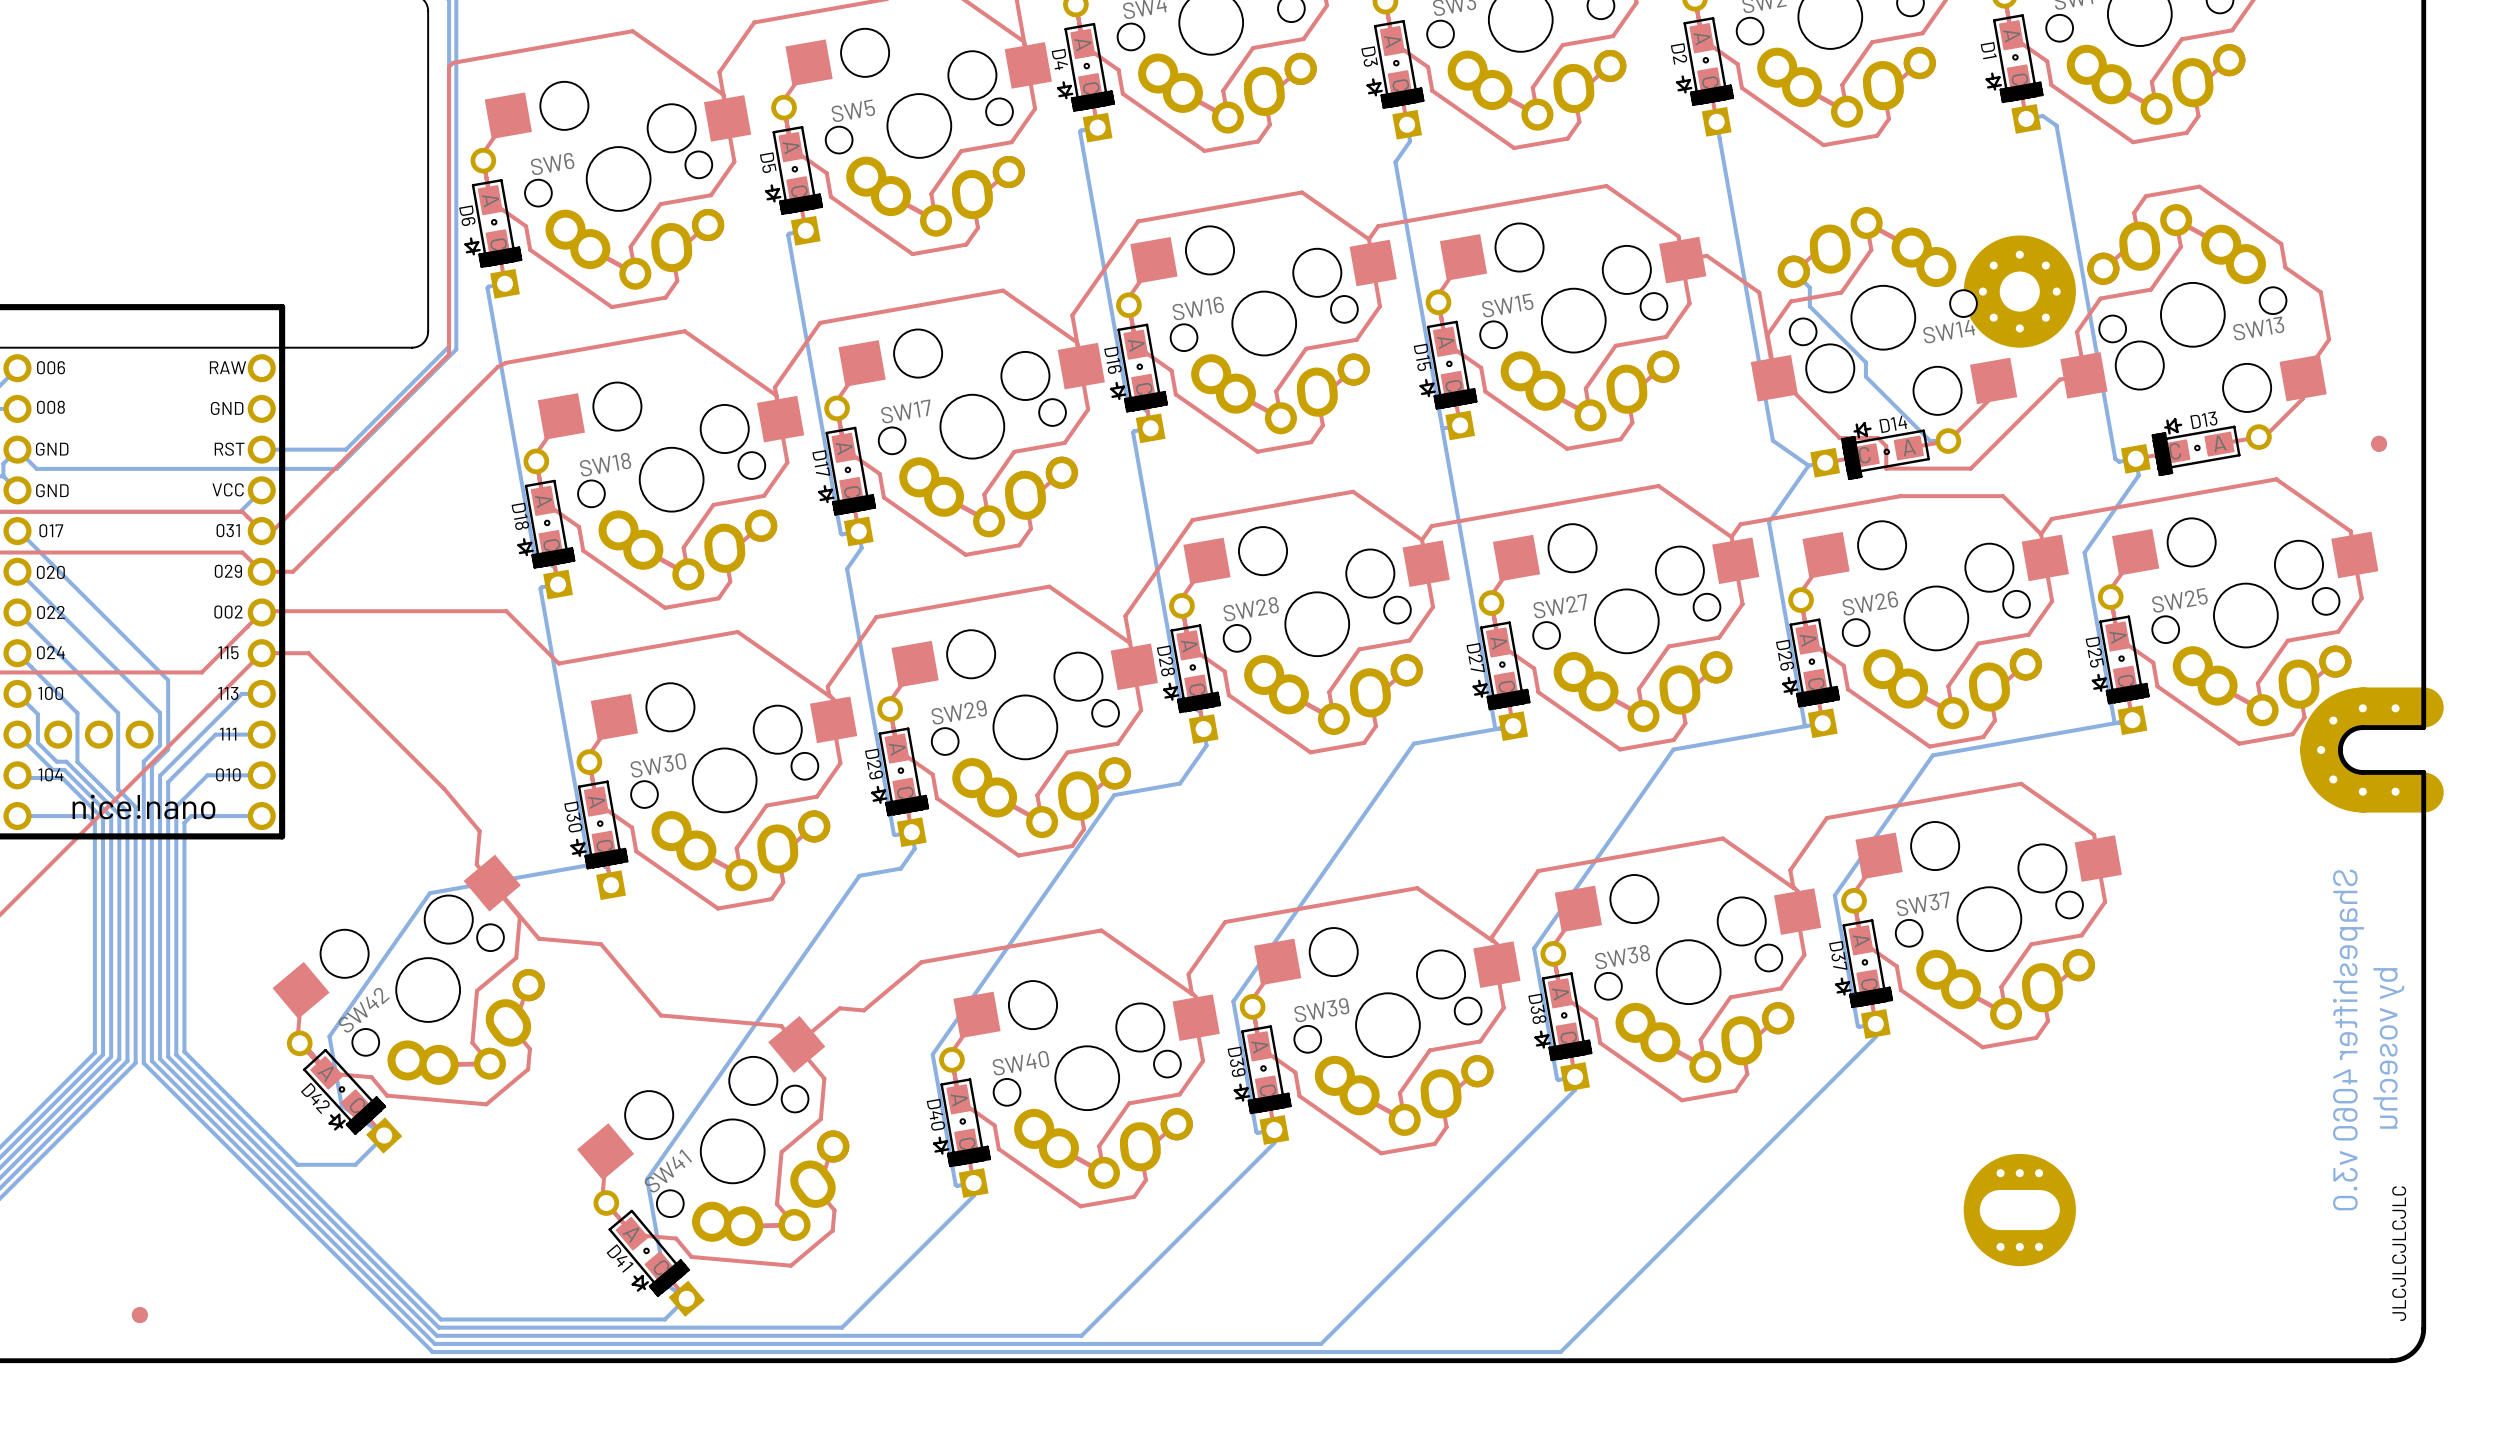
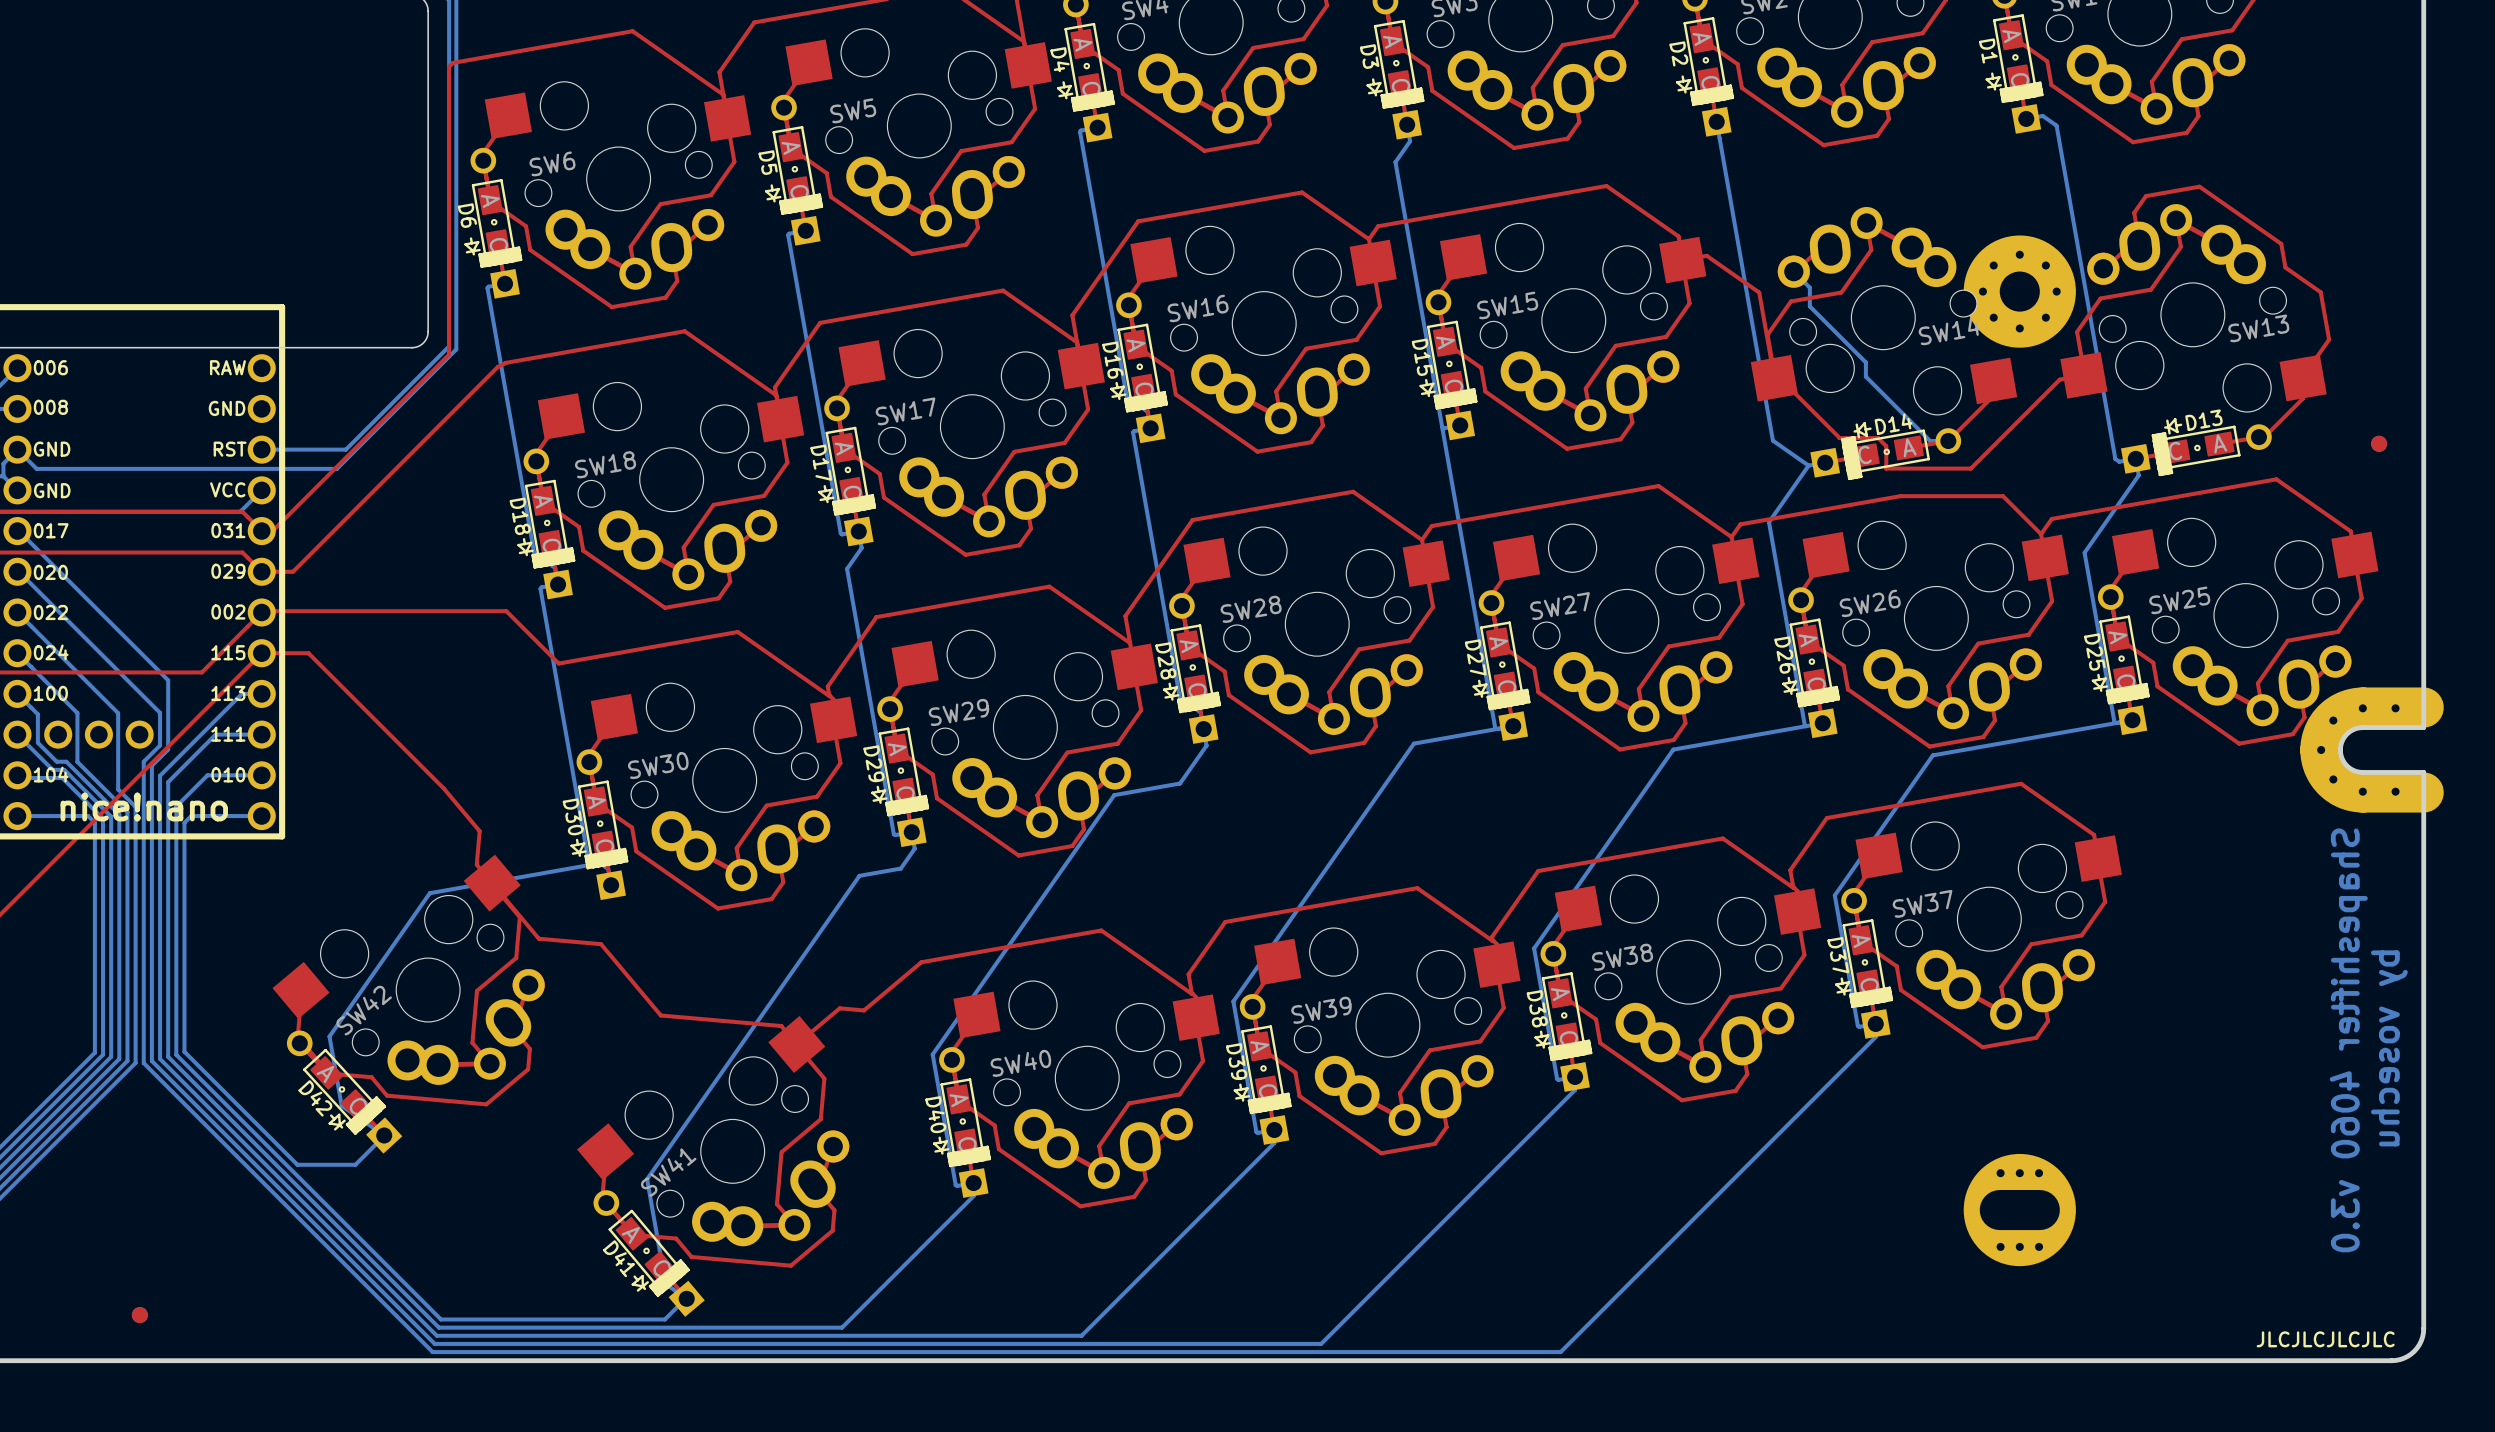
text rotation: 0° (2399, 1253) -> 90° clockwise (2325, 1339)

